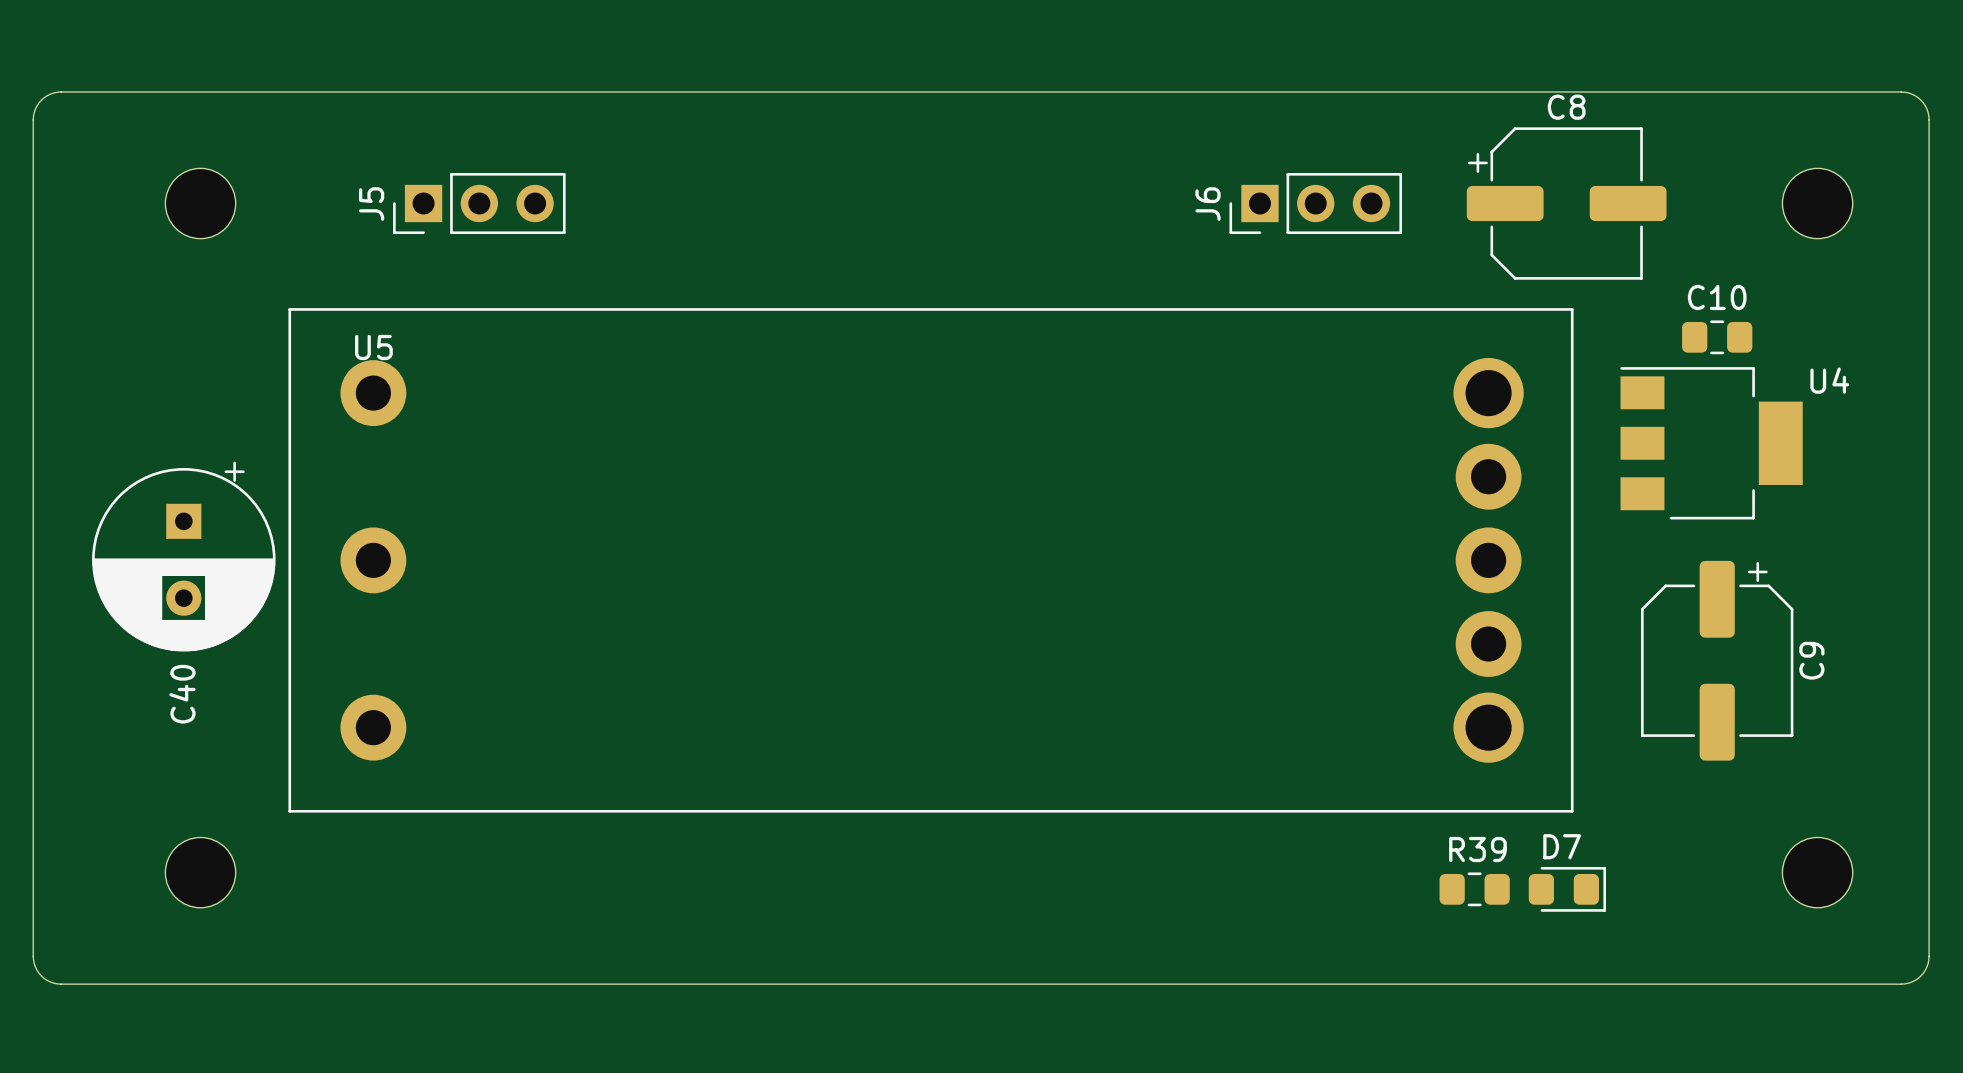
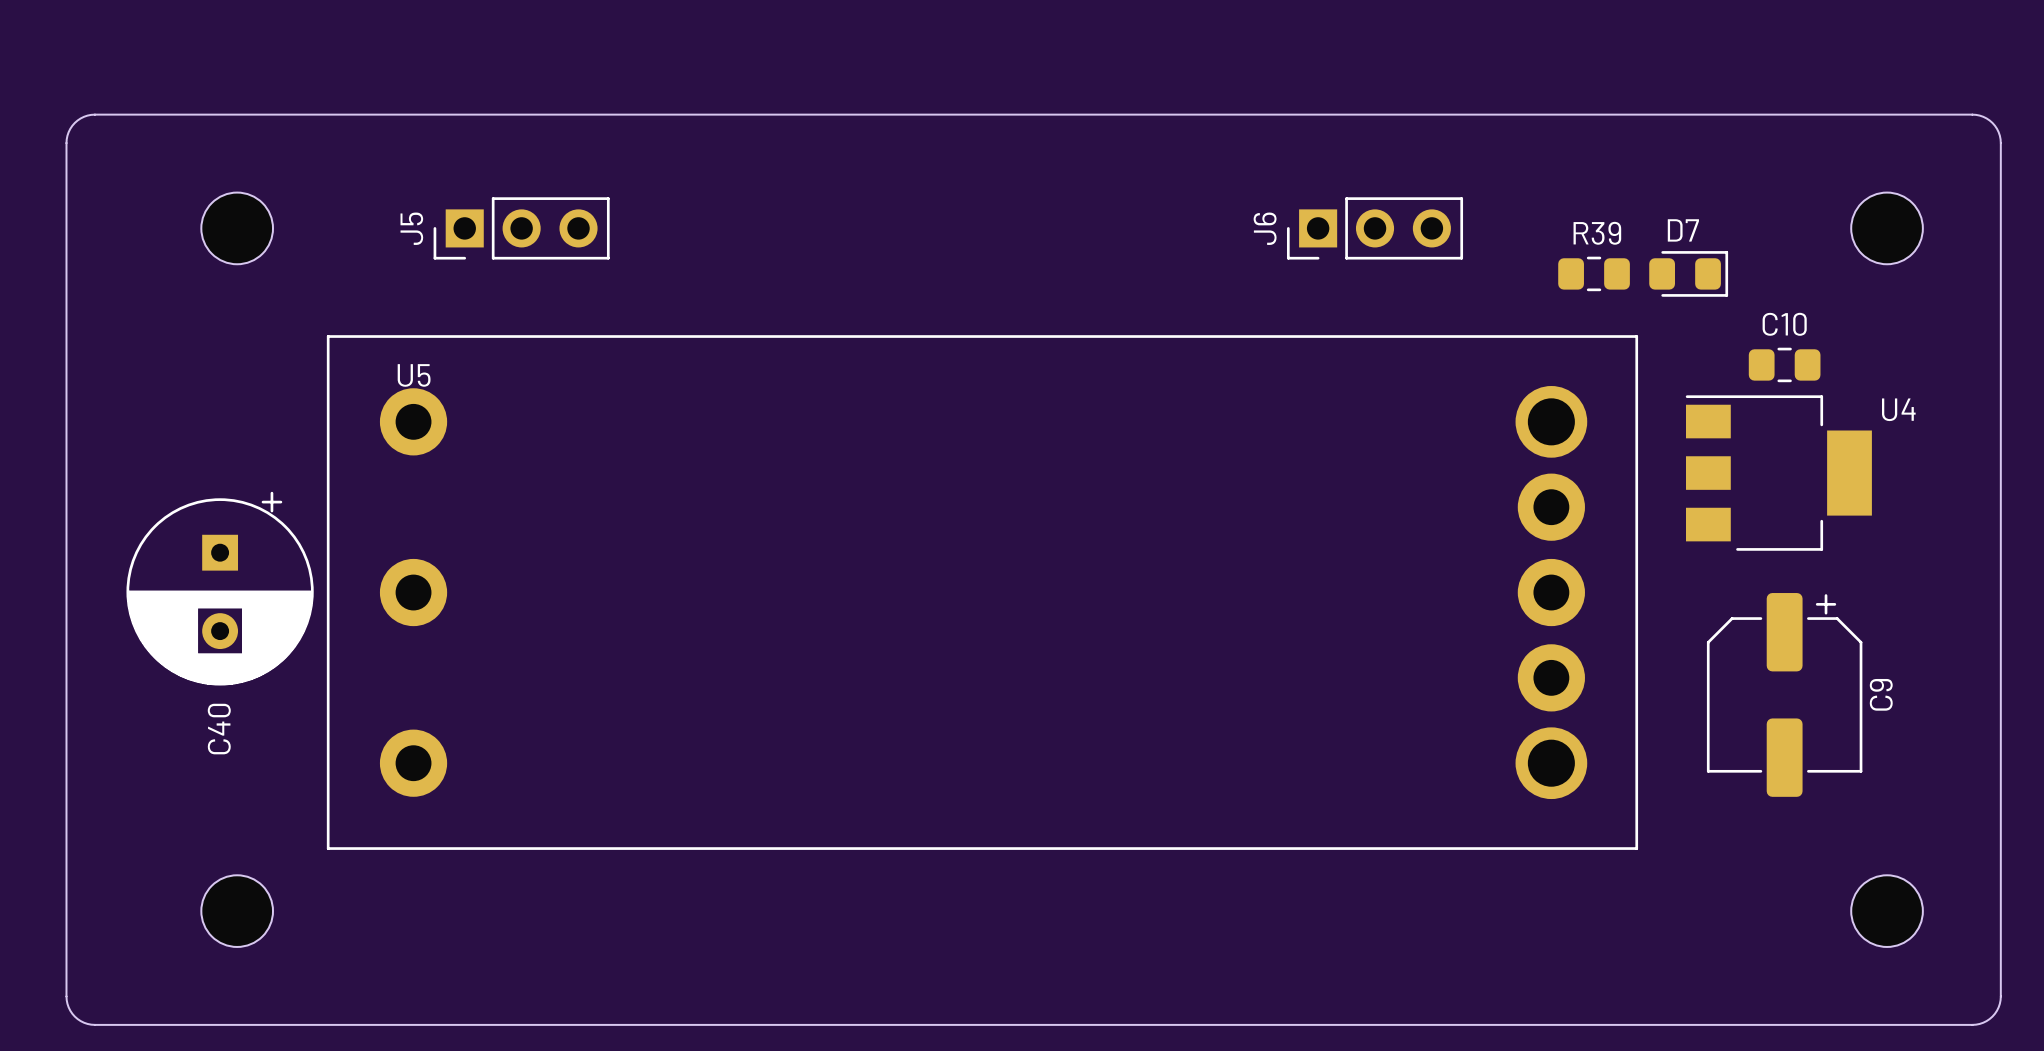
C8: (1566, 203) -> none
R39 position: (1474, 889) -> (1594, 273)
D7 position: (1567, 889) -> (1688, 273)

